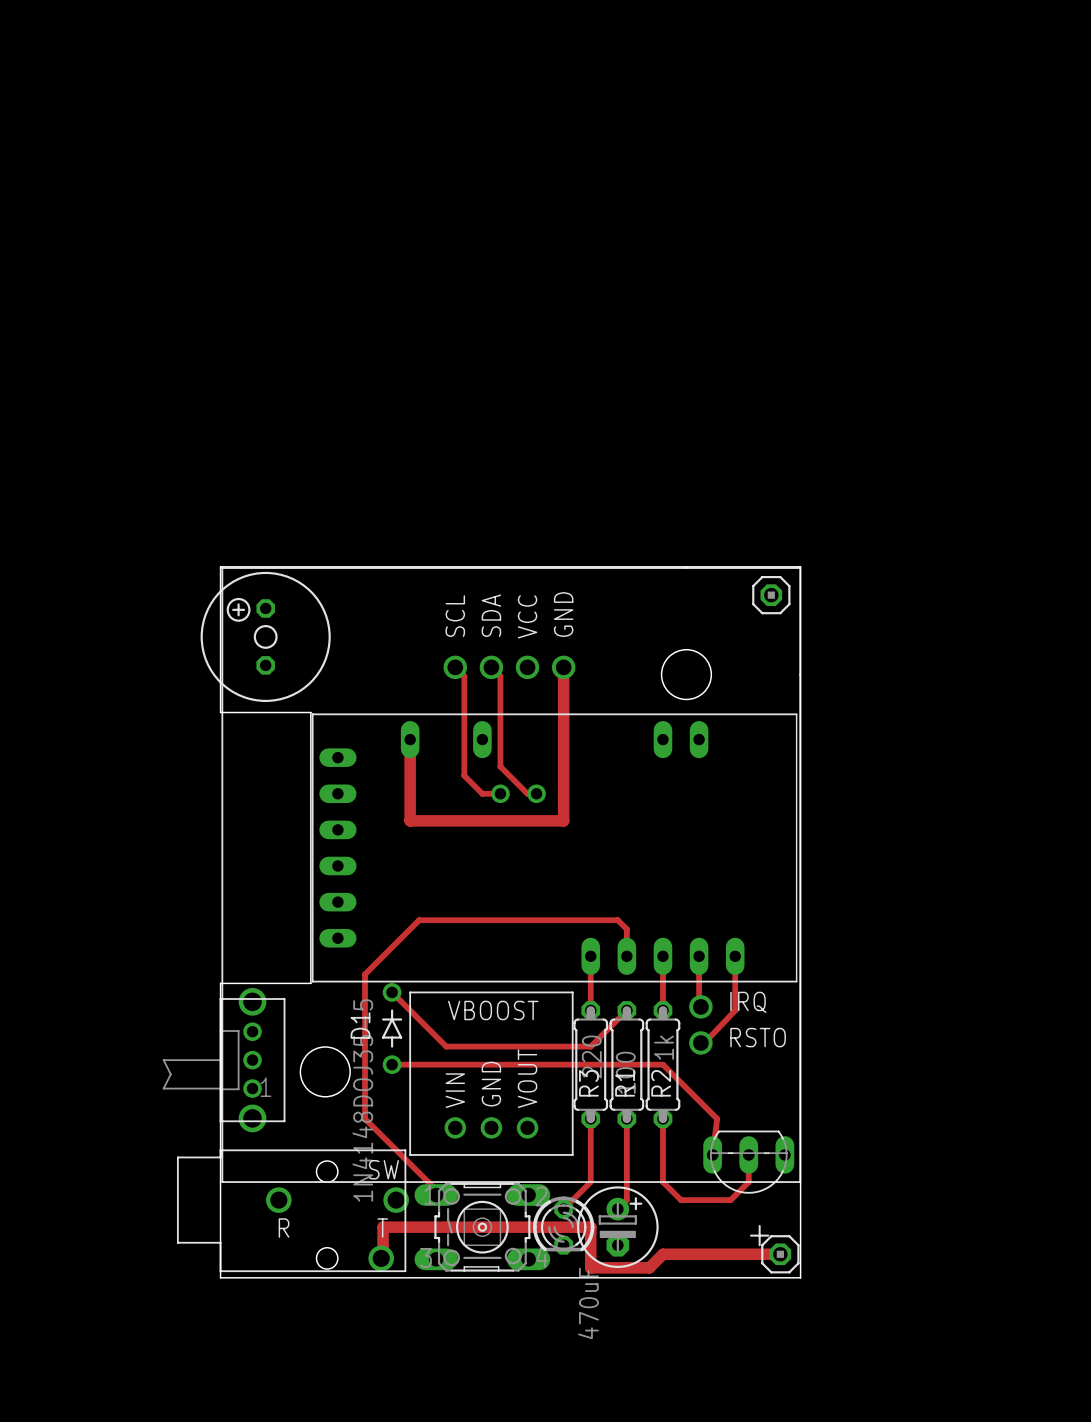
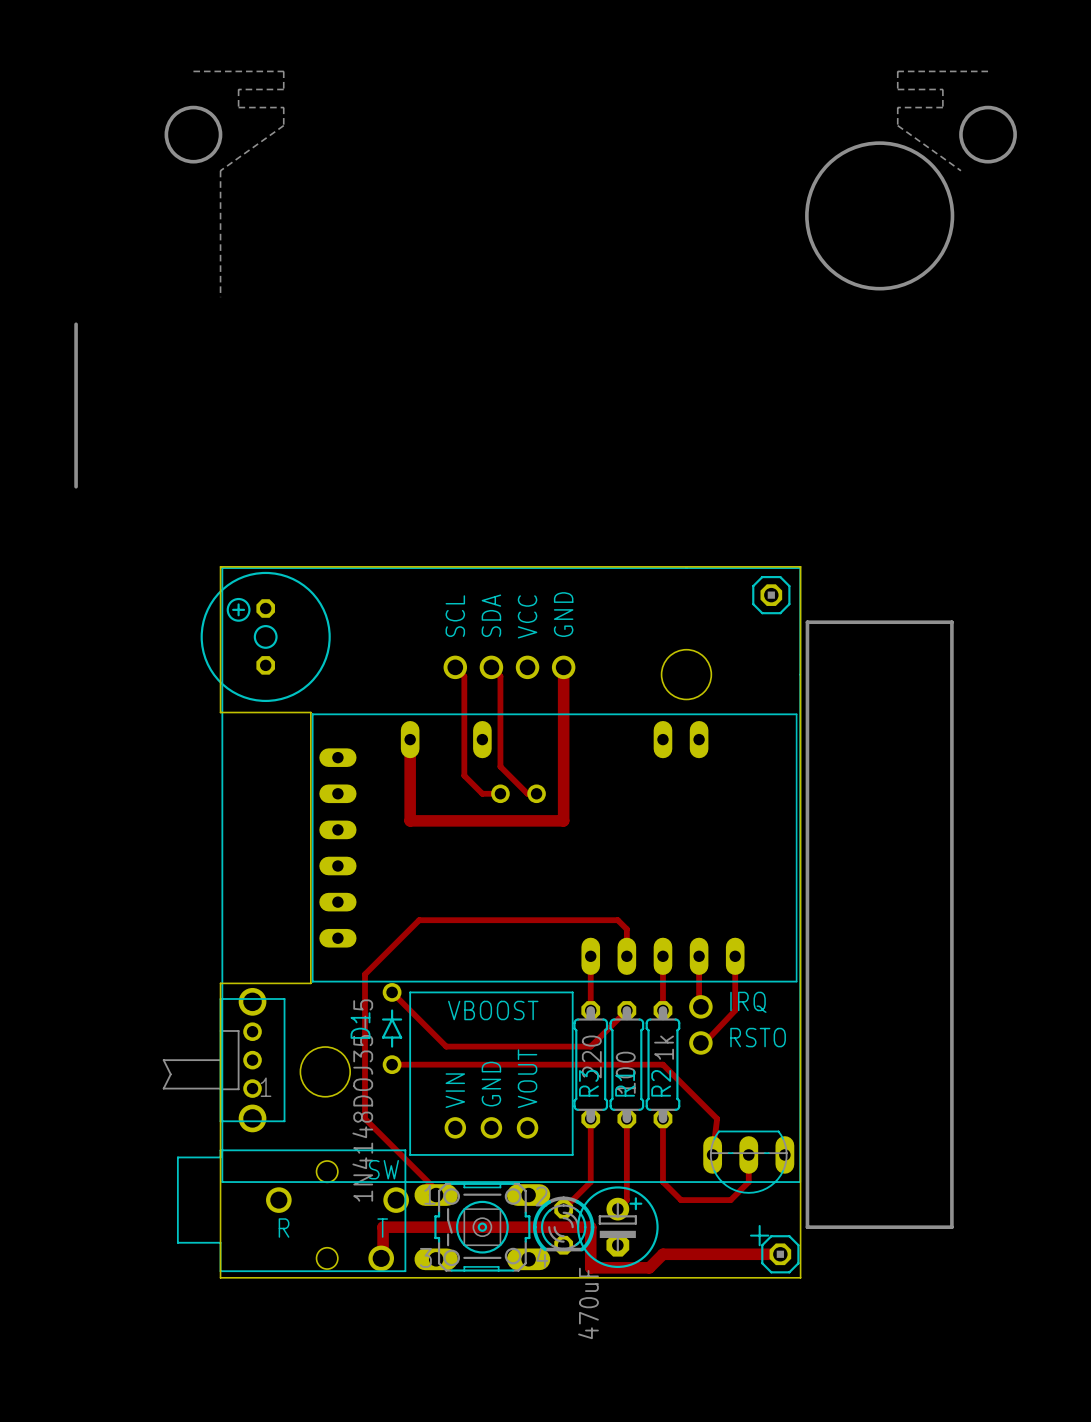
line: none -> (193, 71) (283, 71) (283, 89) (238, 89) (238, 107) (283, 107) (283, 125) (220, 170) (220, 297)
line: none -> (988, 71) (897, 71) (897, 89) (942, 89) (942, 107) (897, 107) (897, 125) (960, 170)
drawing: none -> [164, 105, 223, 164]
drawing: none -> [805, 105, 1017, 291]
line: none -> (76, 324) (76, 486)
line: none -> (807, 622) (951, 622) (951, 1227) (807, 1227) (807, 622)

